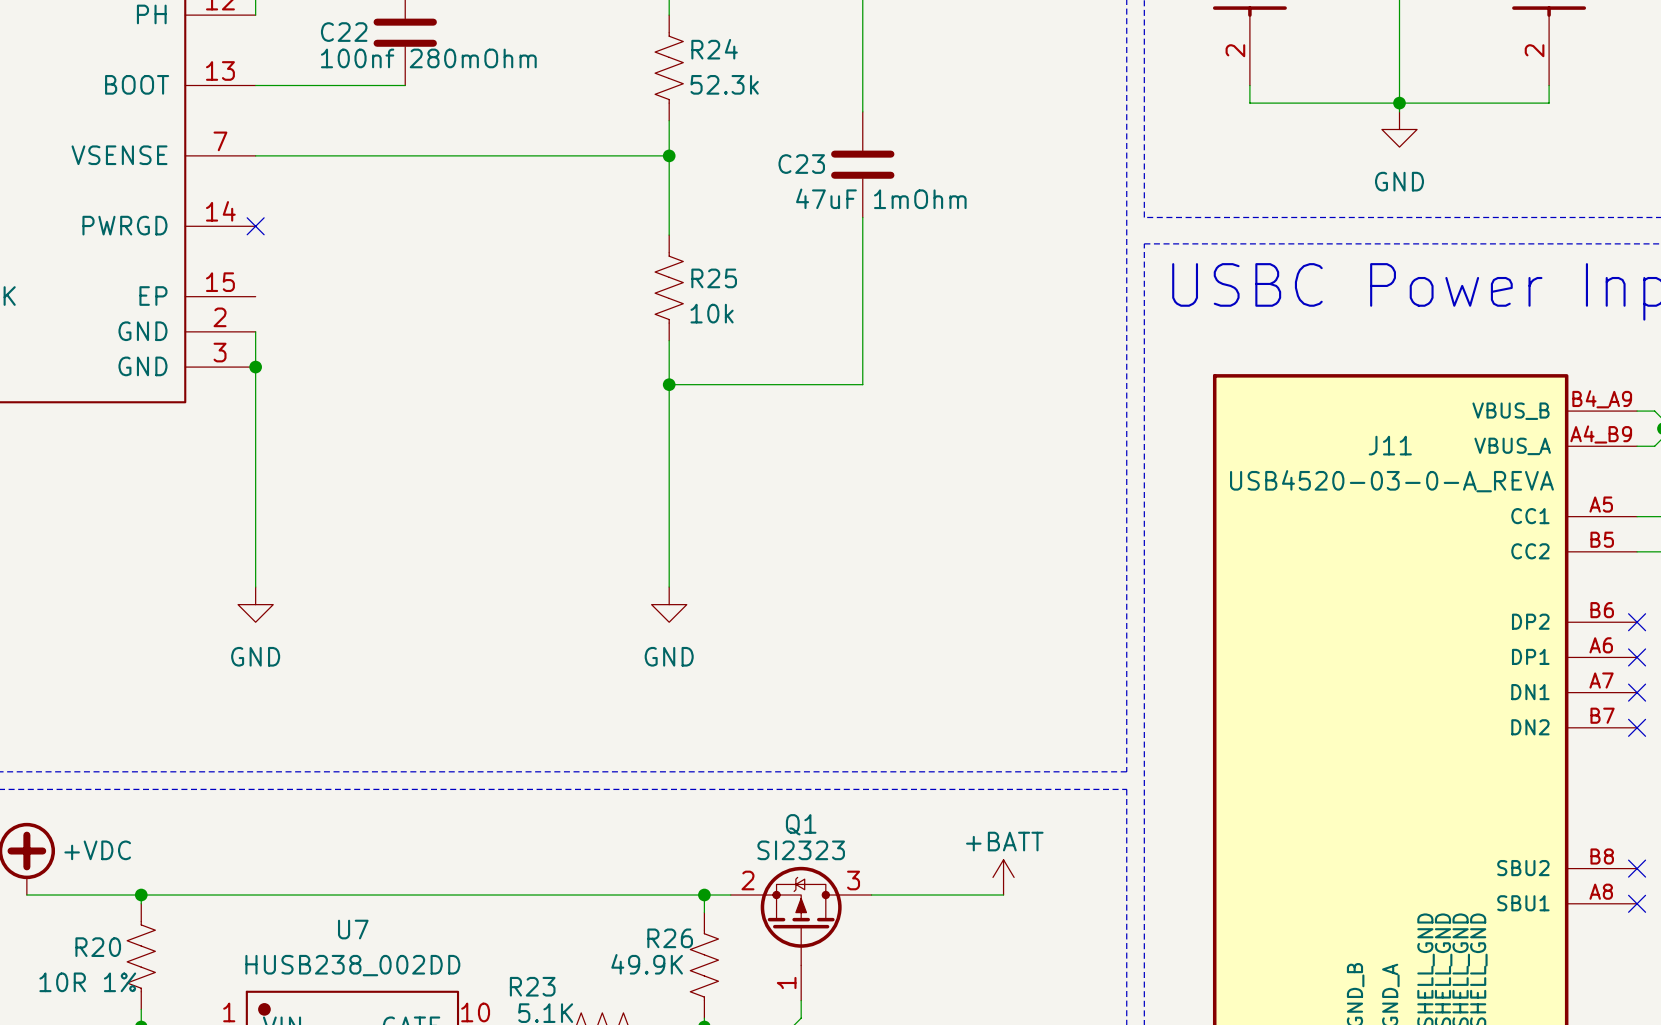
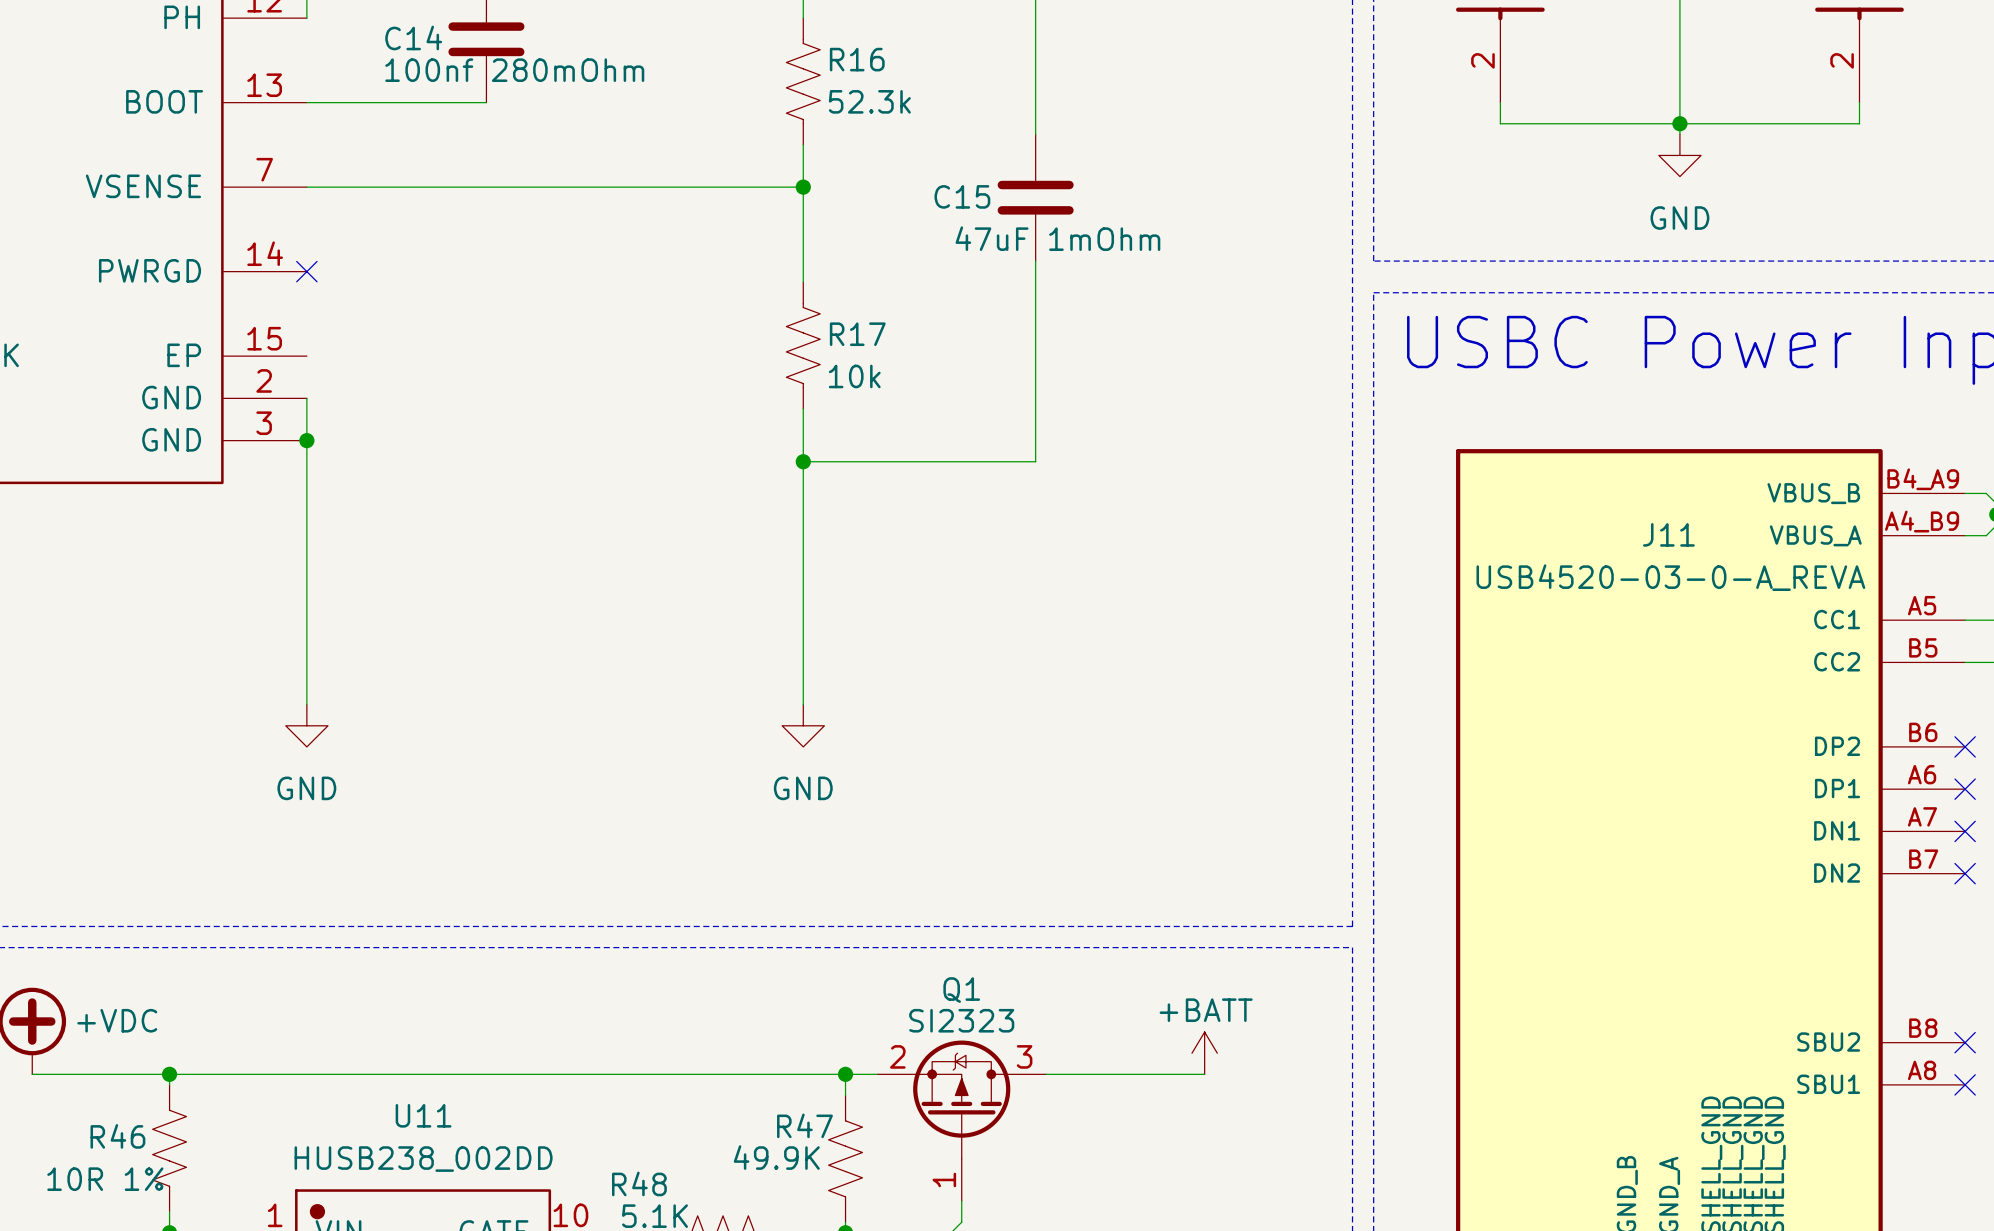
C22 name: C22 (344, 32) -> C14 (413, 37)
R24 name: R24 (714, 49) -> R16 (857, 59)
C23 name: C23 (801, 164) -> C15 (962, 196)
R25 name: R25 (714, 278) -> R17 (857, 334)
U7 name: U7 (353, 929) -> U11 (423, 1115)
R26 name: R26 (670, 938) -> R47 (804, 1125)
R20 name: R20 (98, 947) -> R46 (117, 1136)
R23 name: R23 (532, 986) -> R48 (639, 1183)

